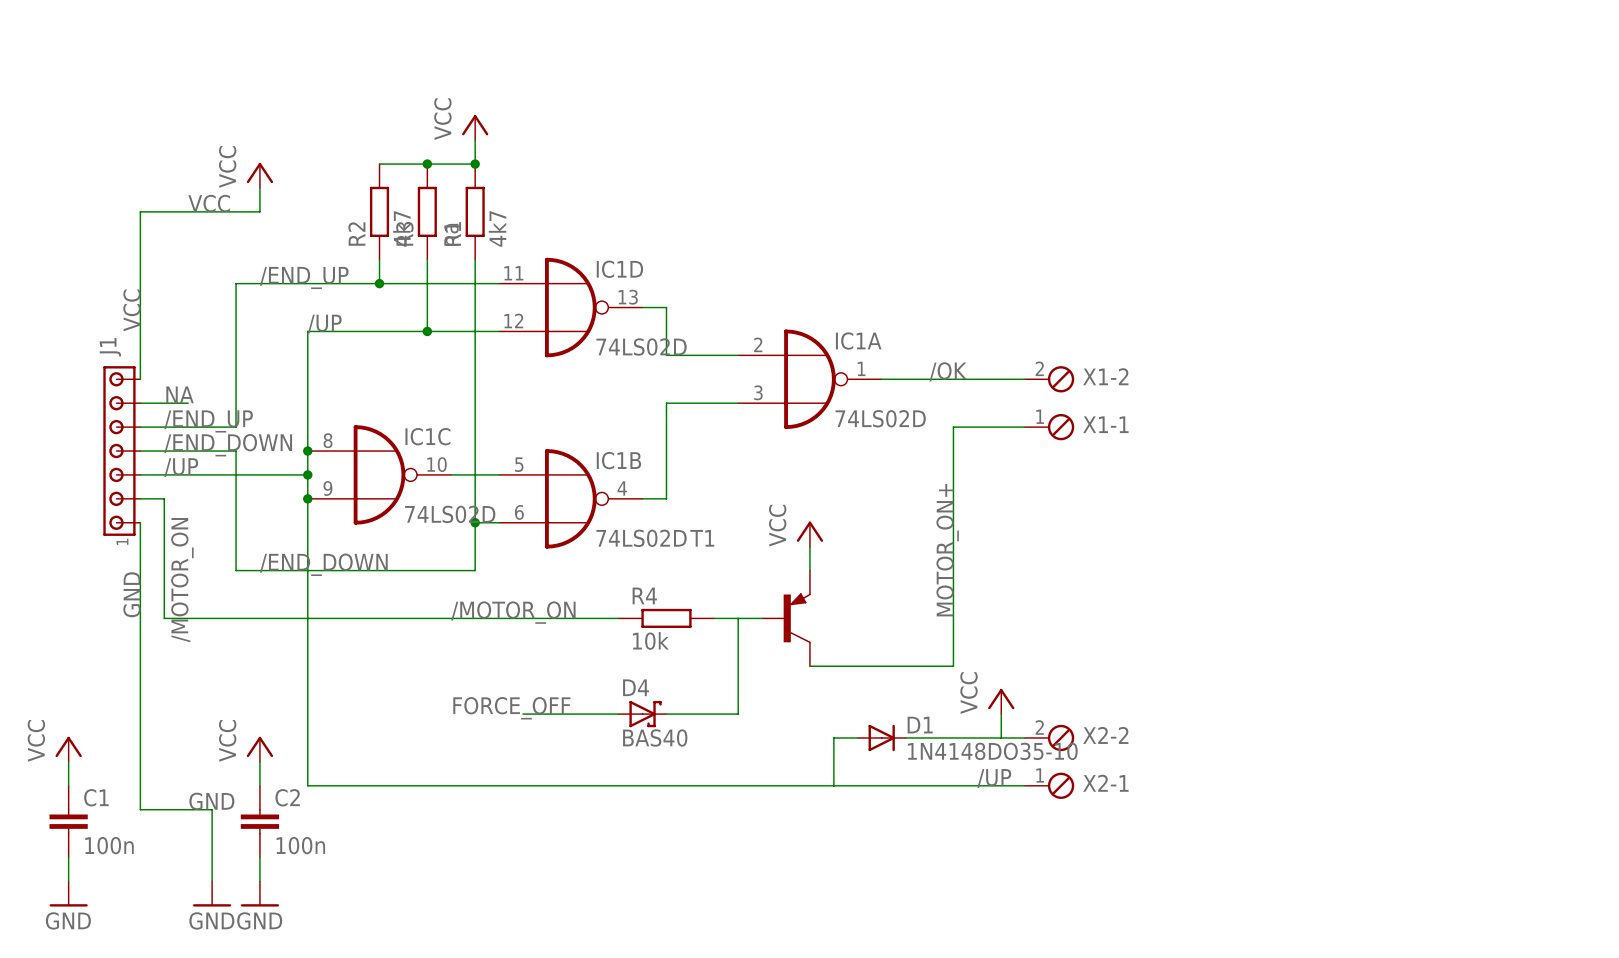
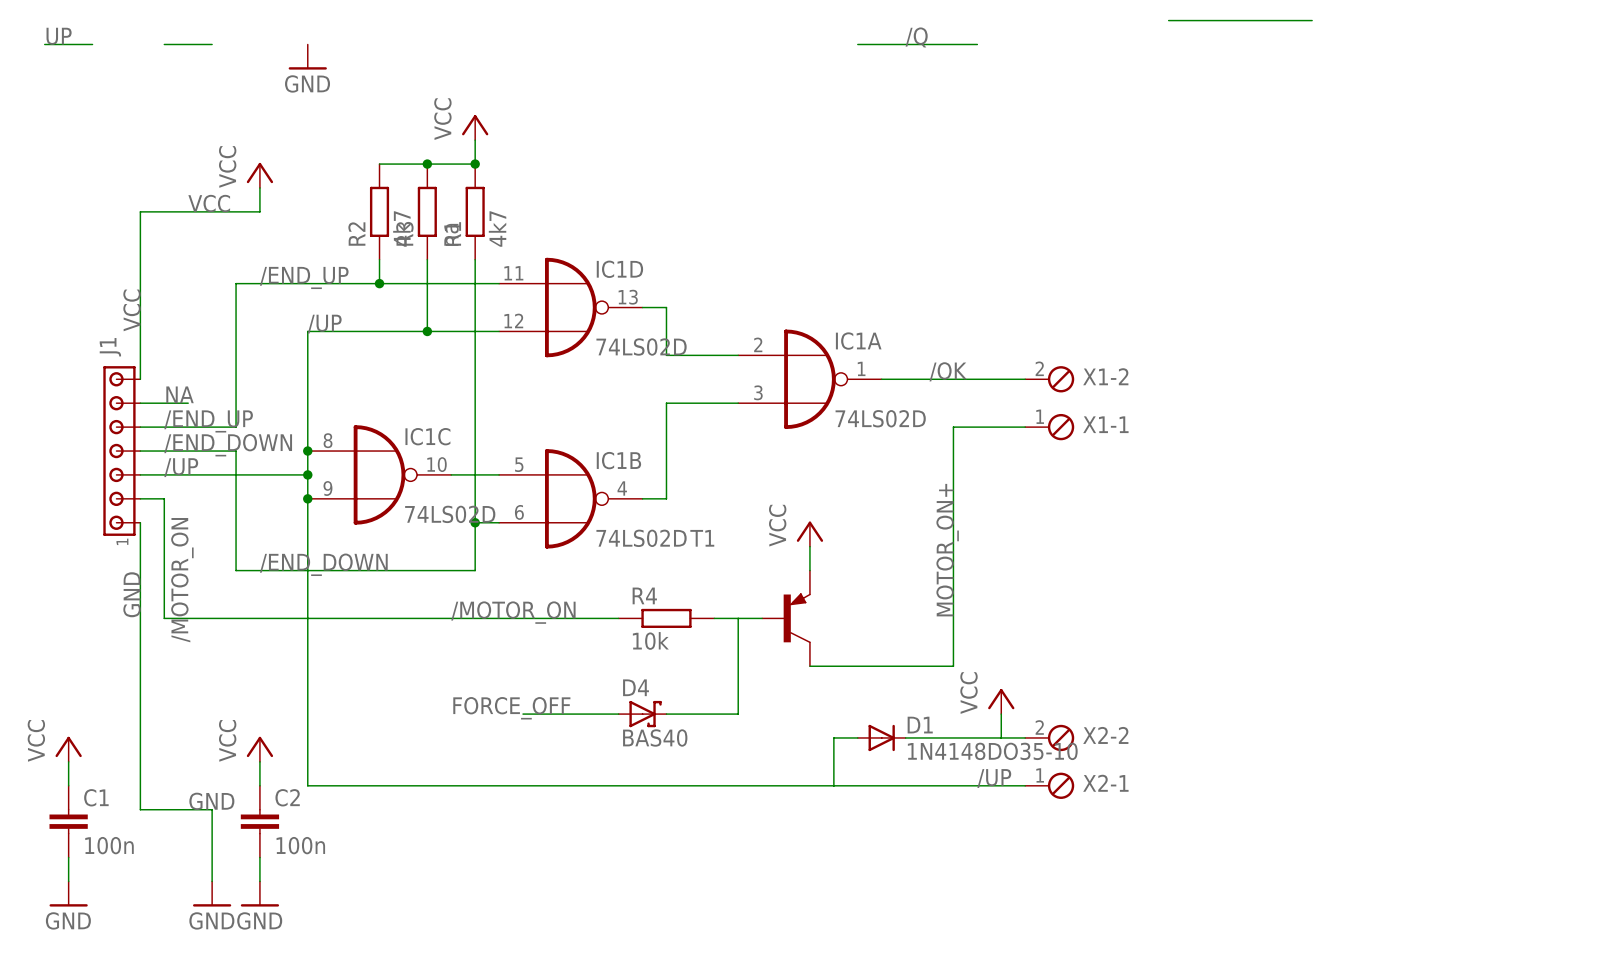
wire: none -> (1168, 20) (1312, 20)
label: none -> UP (59, 36)
label: none -> /Q (916, 37)
wire: none -> (44, 44) (92, 44)
wire: none -> (164, 44) (212, 44)
wire: none -> (857, 44) (977, 44)
power symbol: none -> GND (307, 57)

